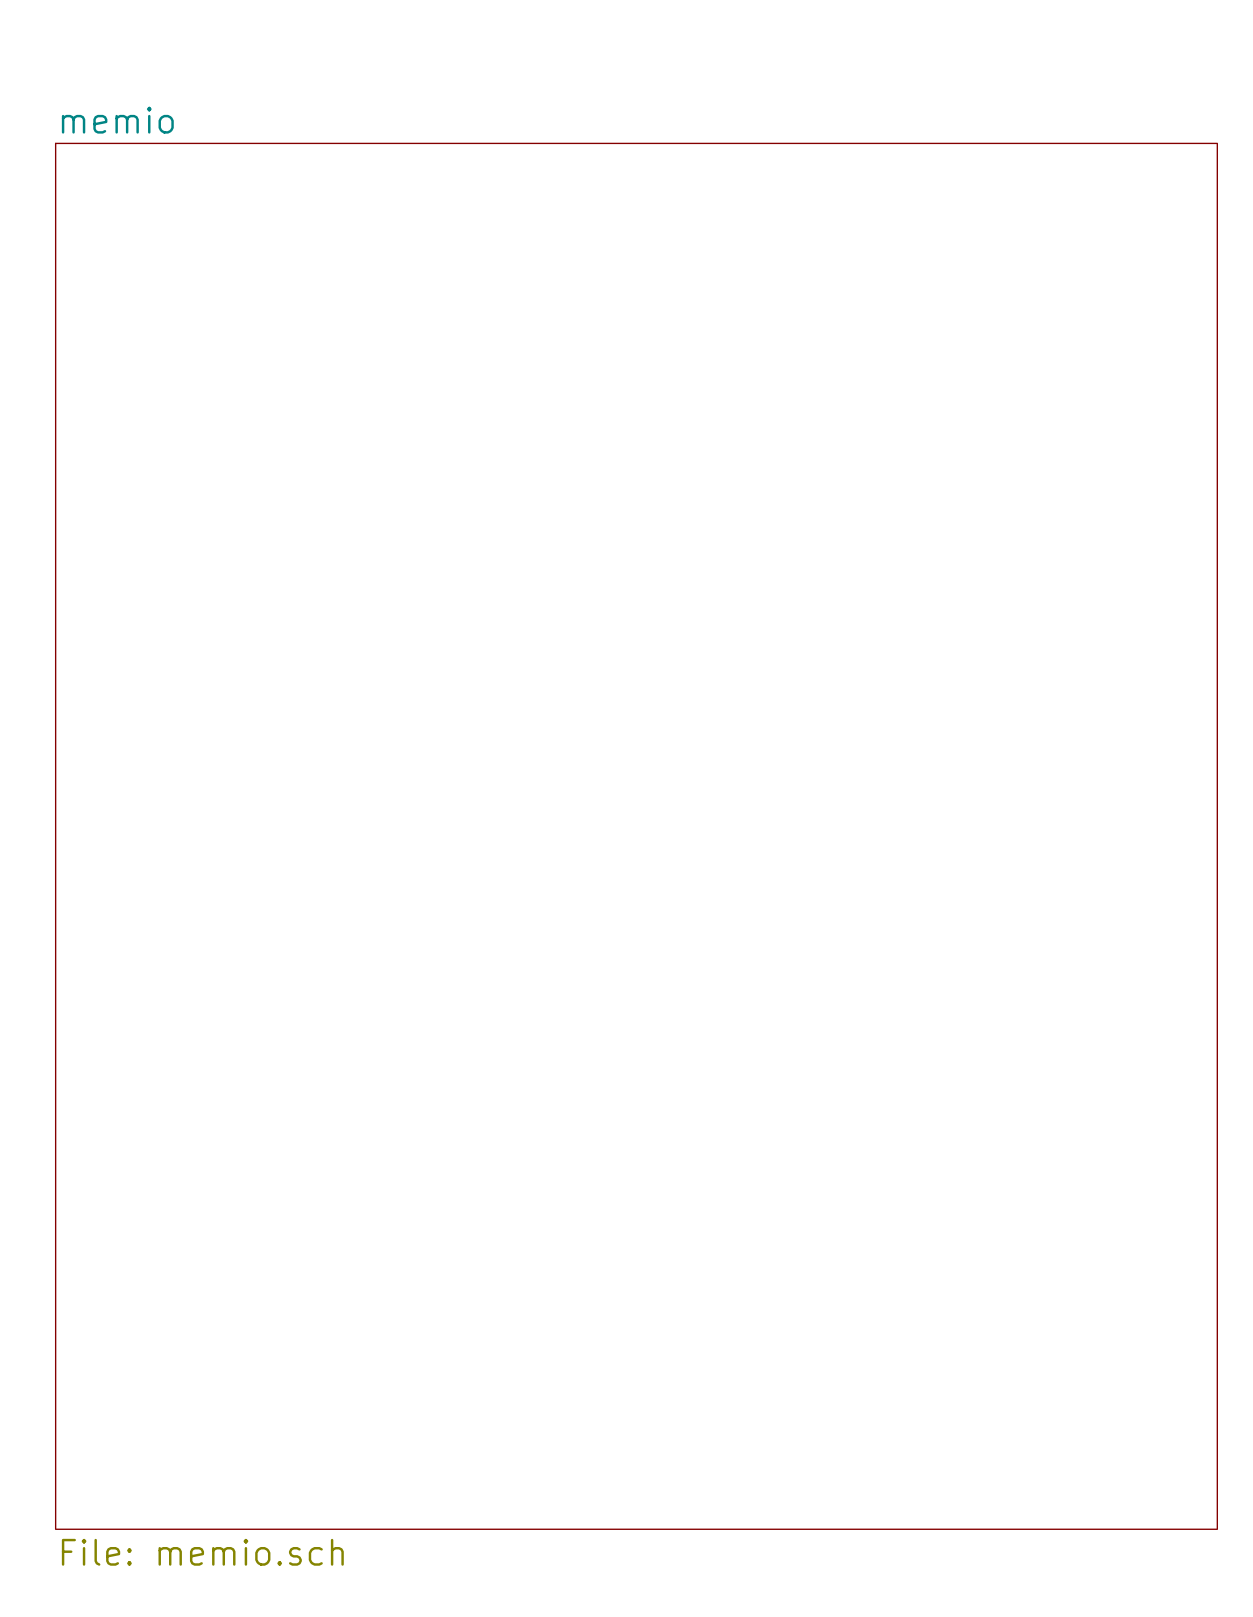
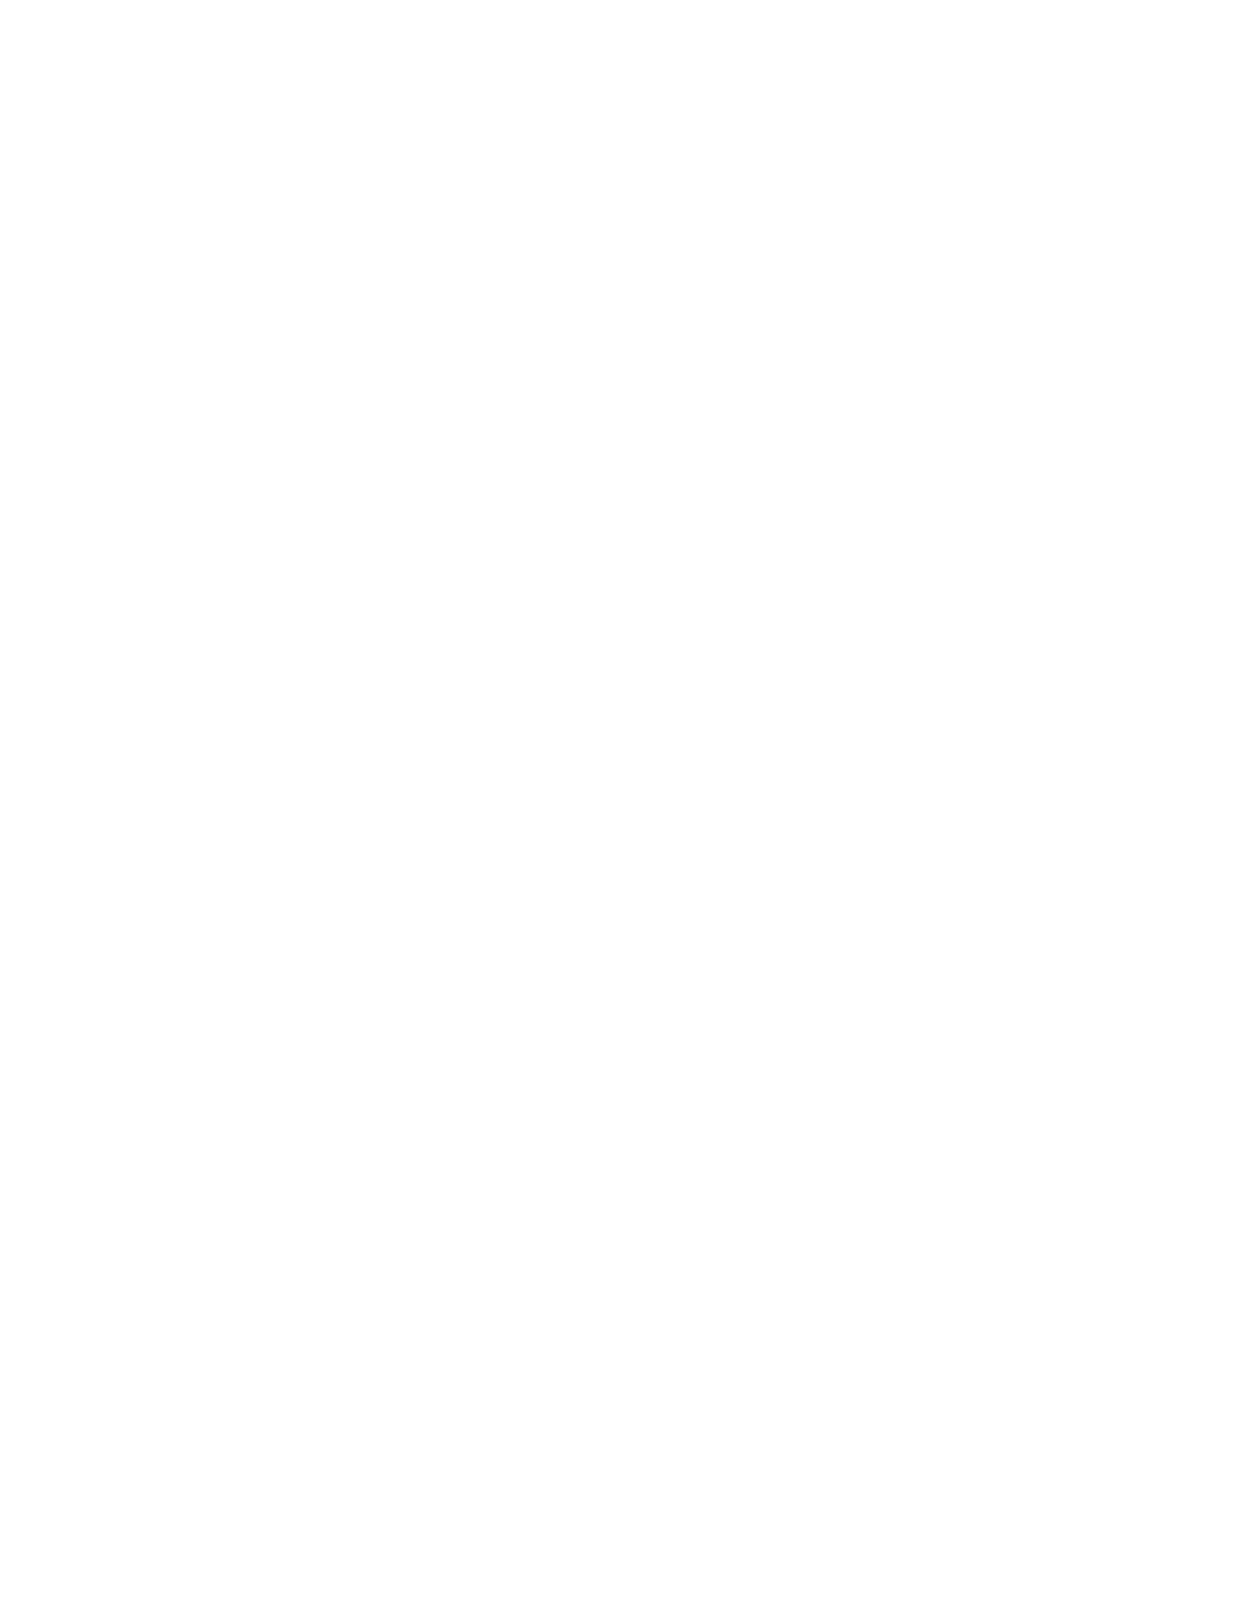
sheet memio: File: memio.sch (636, 836) -> none

